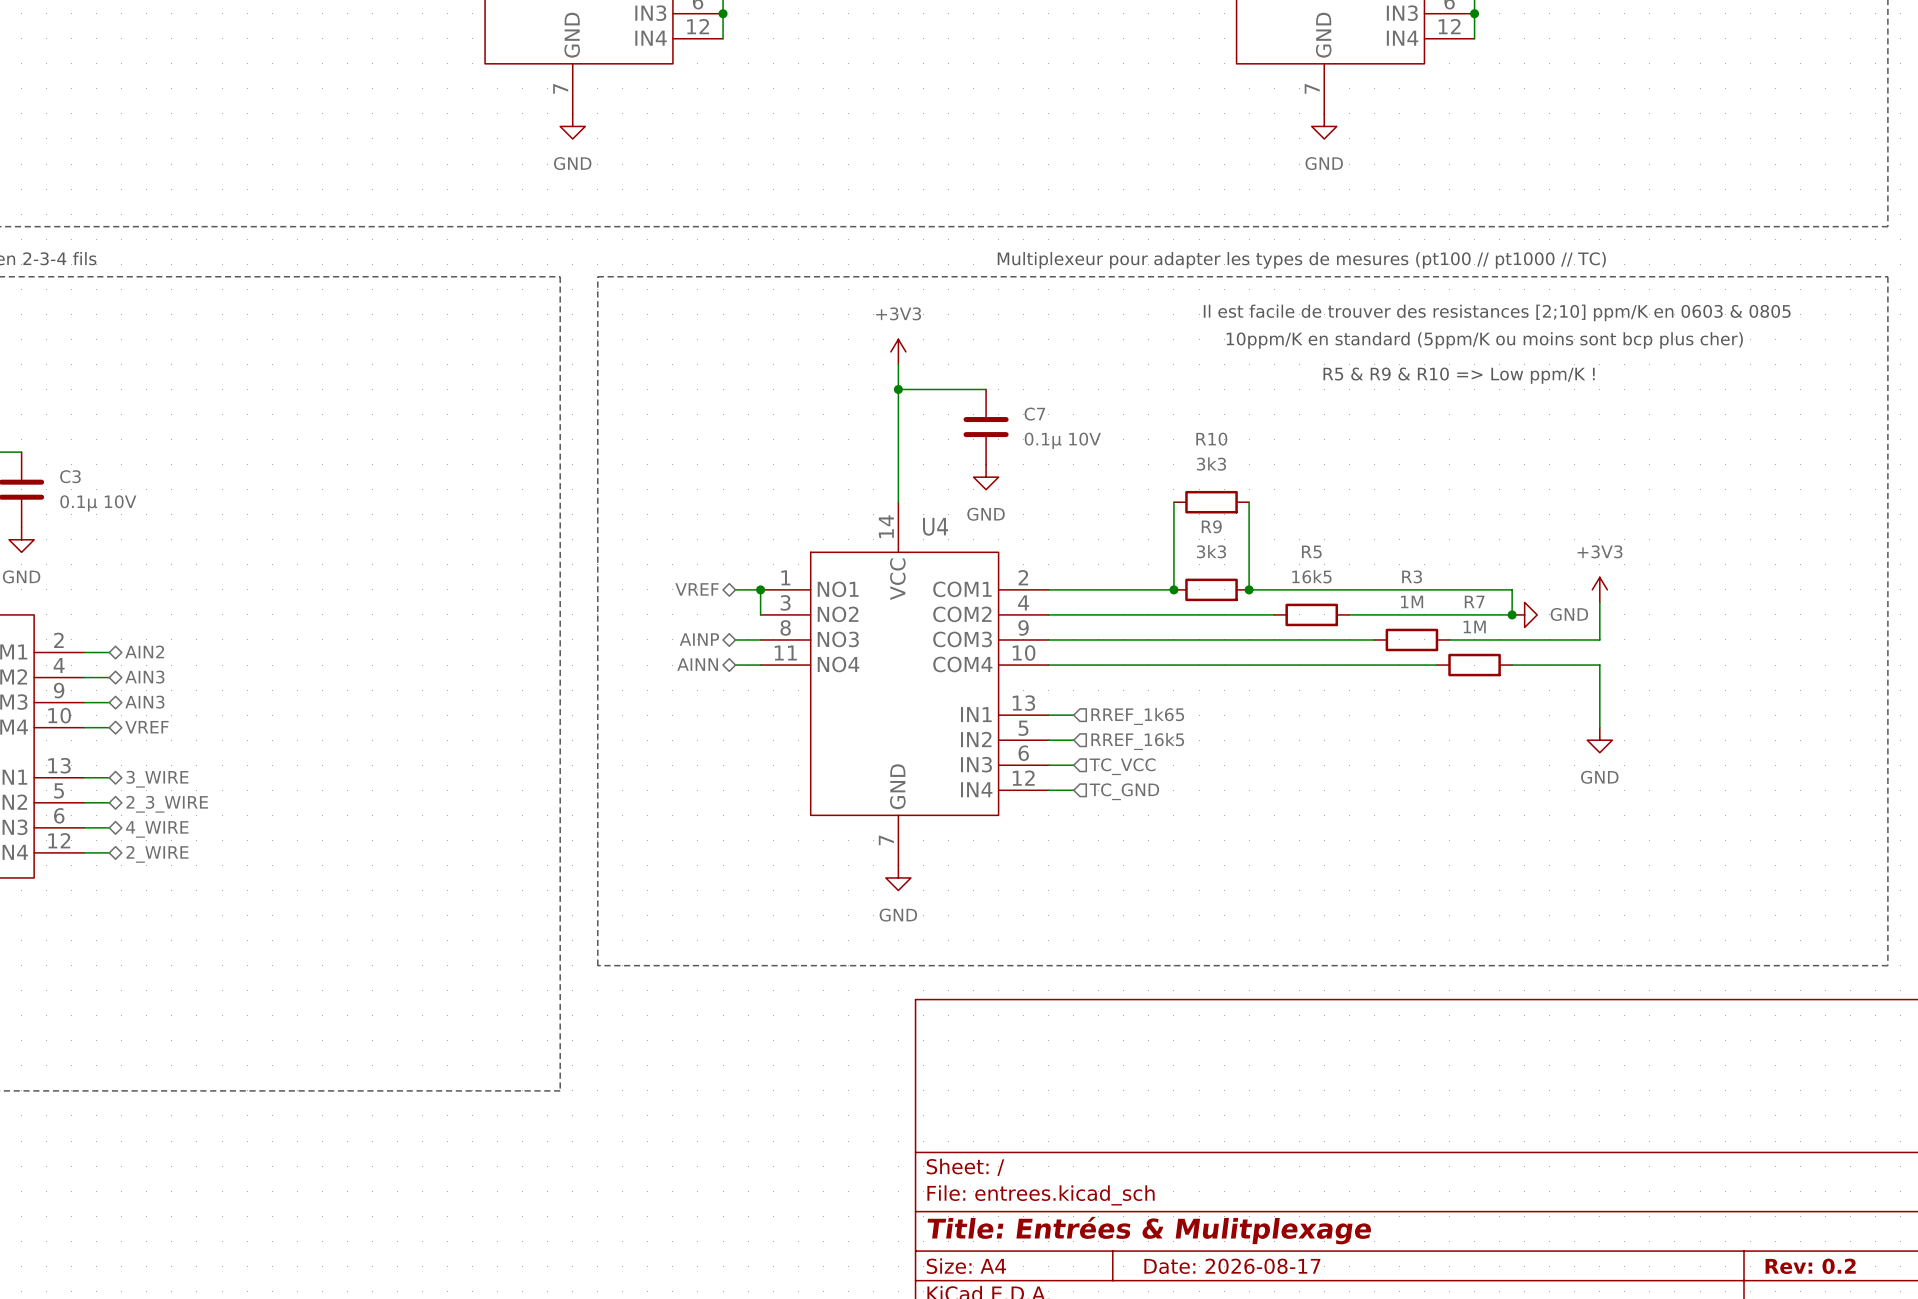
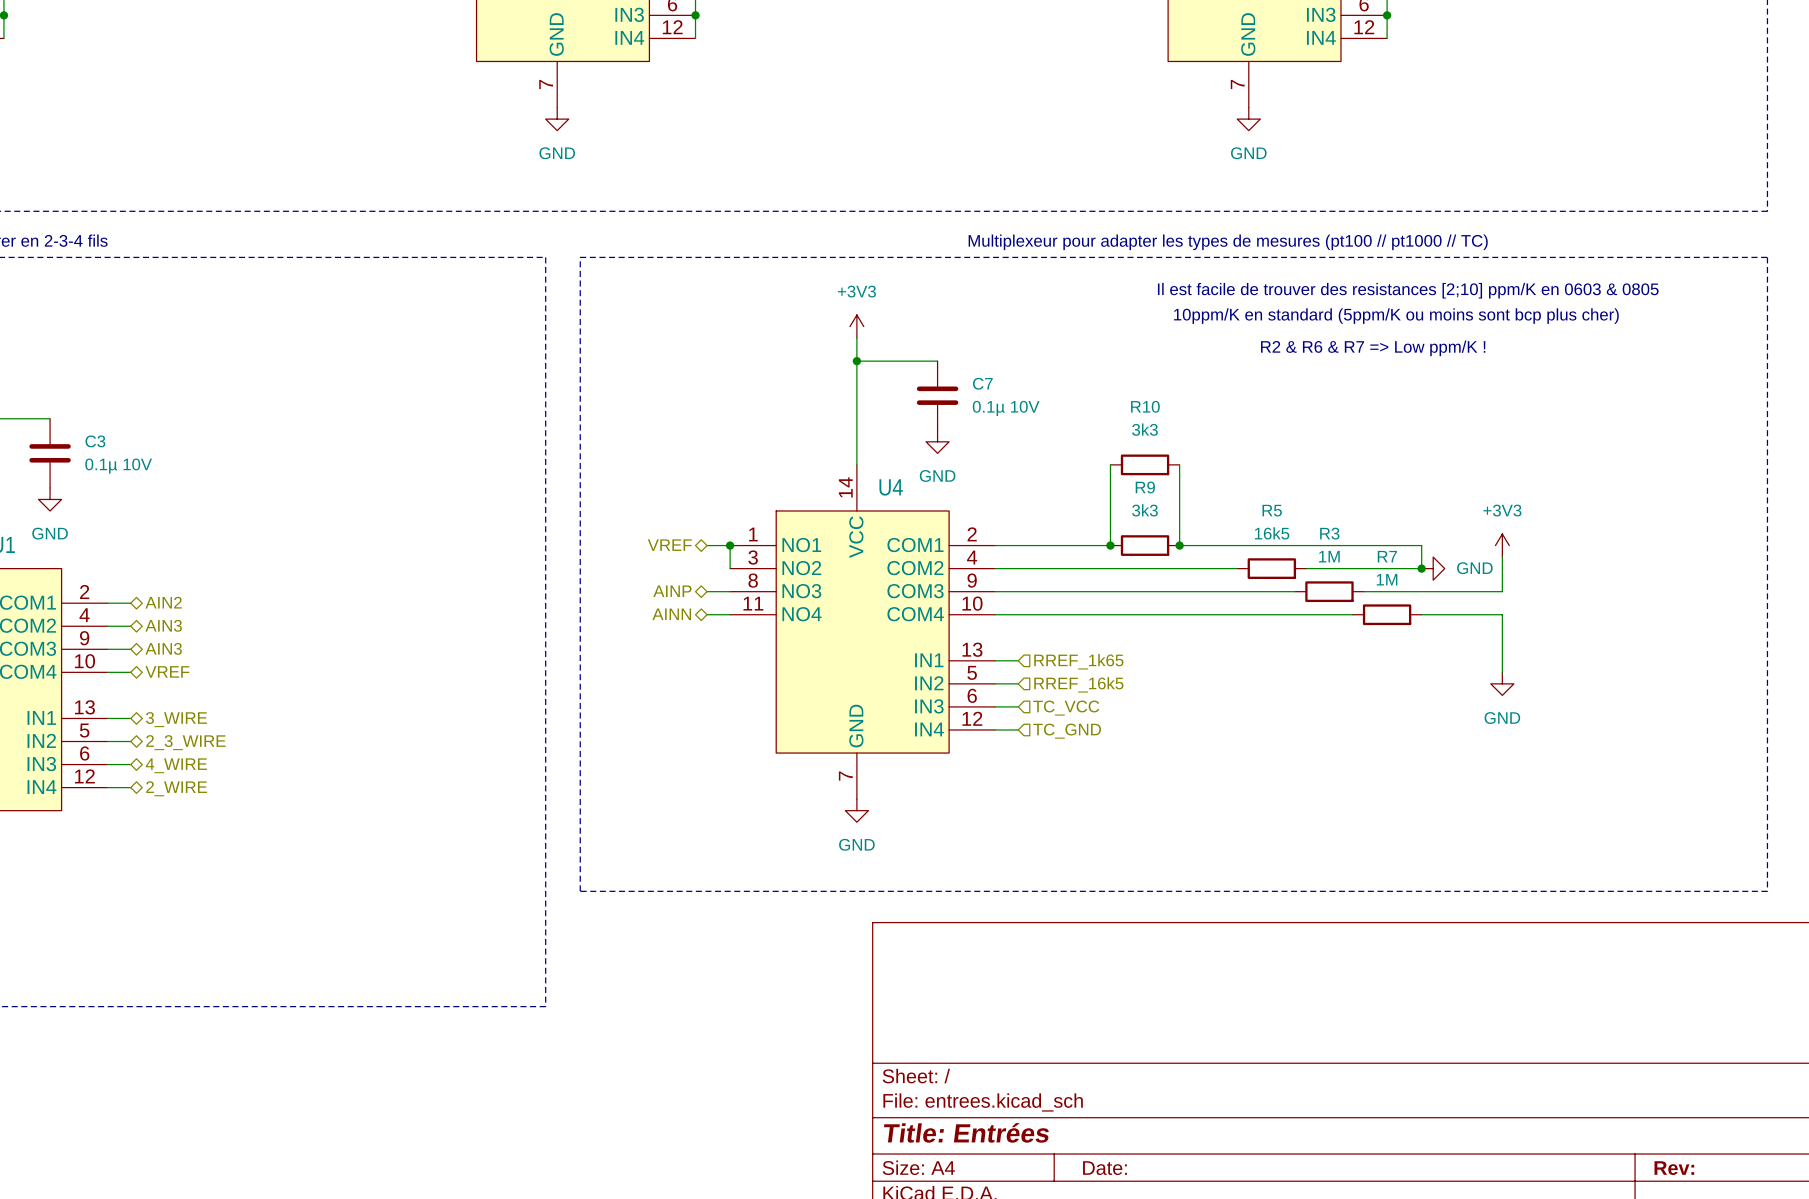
text: R5 & R9 & R10 => Low ppm/K ! (1459, 375) -> R2 & R6 & R7 => Low ppm/K ! (1373, 348)
R5 position: (1311, 614) -> (1271, 568)
wire: (1349, 614) (1386, 614) -> (1202, 568) (1237, 568)
title block: Title: Entrées & Mulitplexage (1149, 1230) -> Title: Entrées (966, 1132)
title block: Date: 2026-08-17 (1232, 1266) -> Date: (1104, 1168)
title block: Rev: 0.2 (1810, 1266) -> Rev: (1674, 1168)

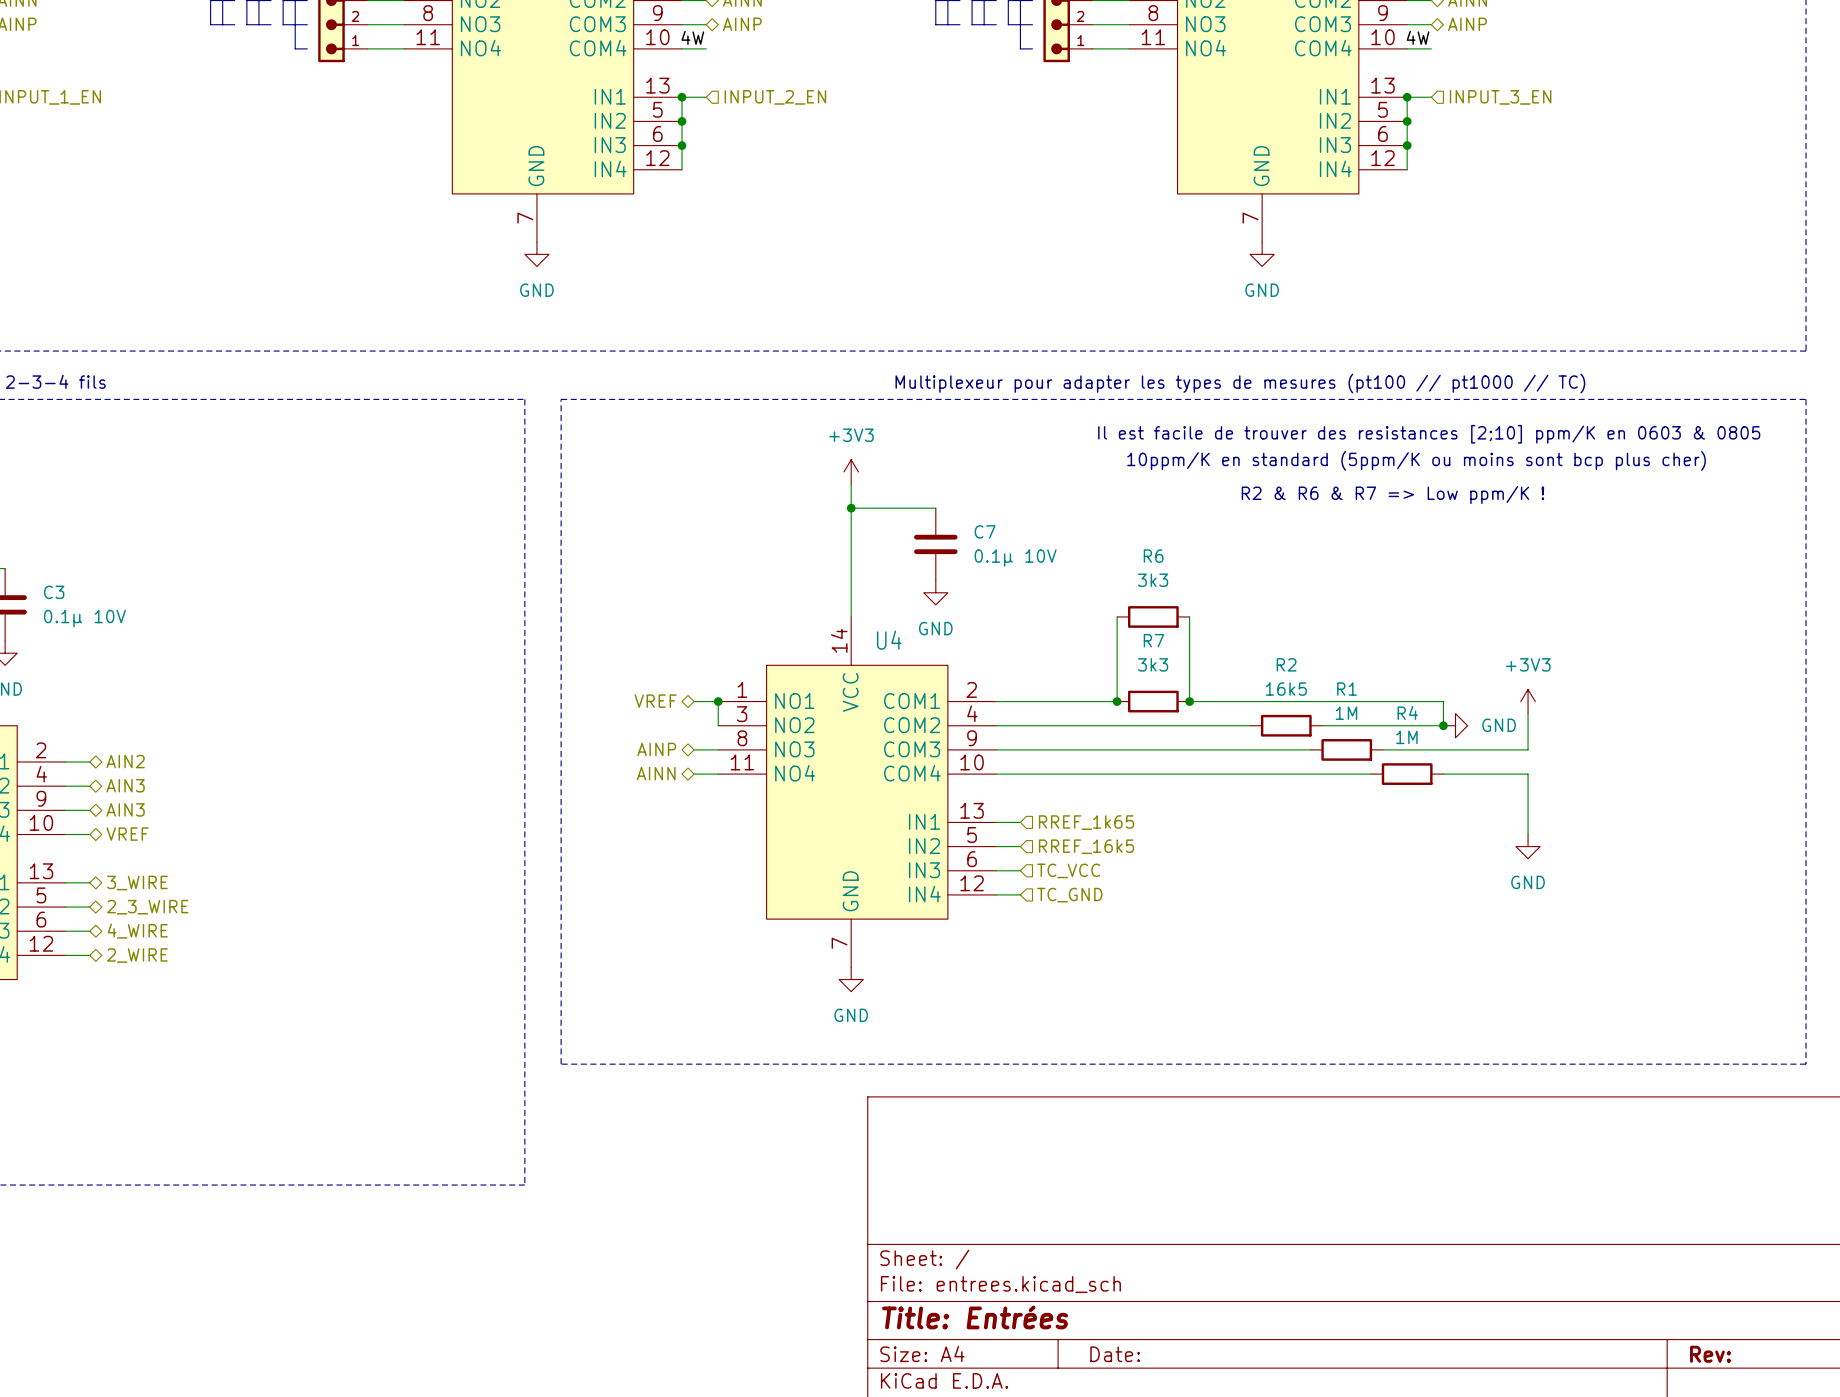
R10 name: R10 (1145, 406) -> R6 (1153, 556)
R9 name: R9 (1145, 487) -> R7 (1153, 640)
R5 name: R5 (1272, 510) -> R2 (1286, 664)
R3 name: R3 (1329, 533) -> R1 (1347, 689)
R7 name: R7 (1387, 556) -> R4 (1407, 712)

